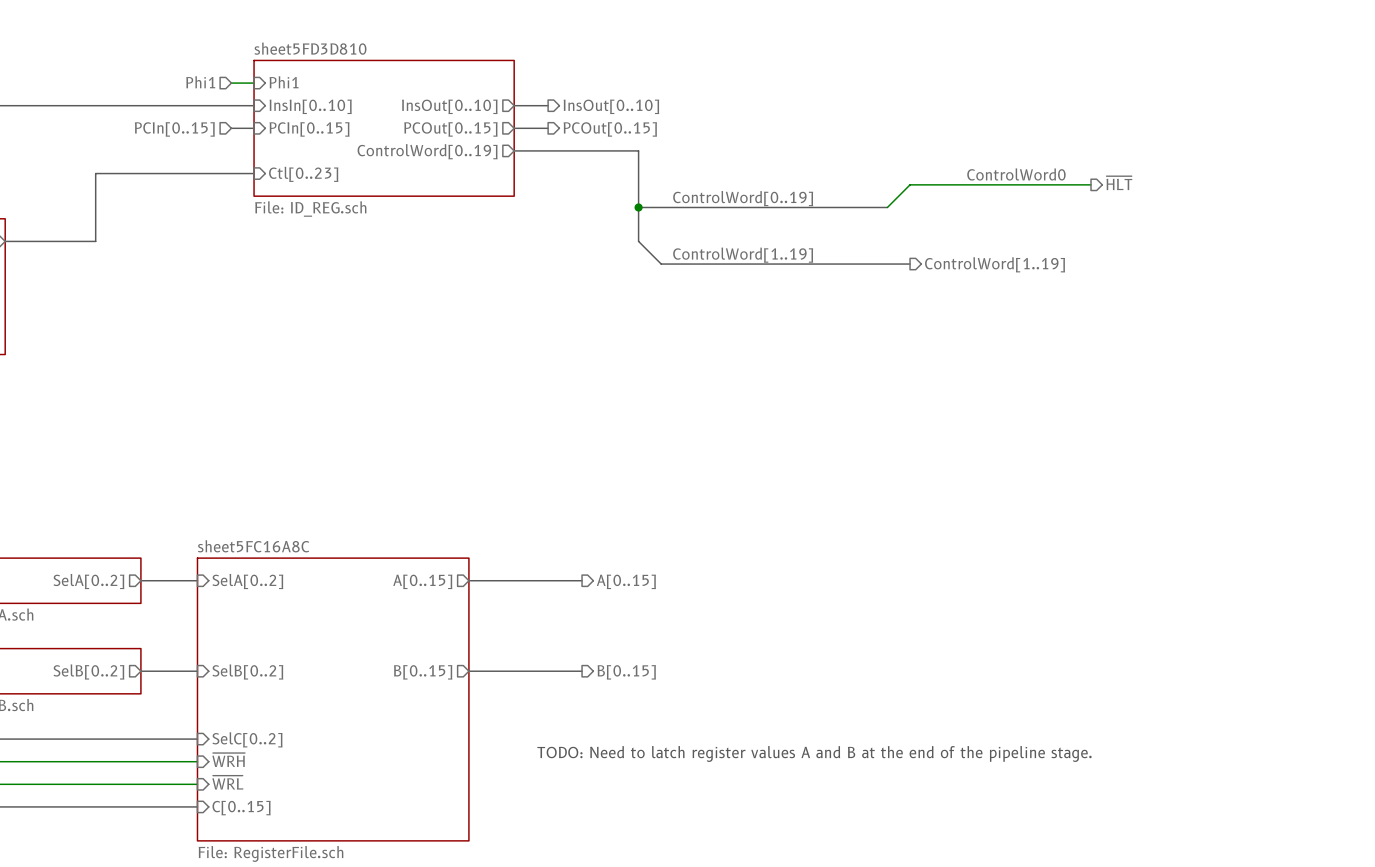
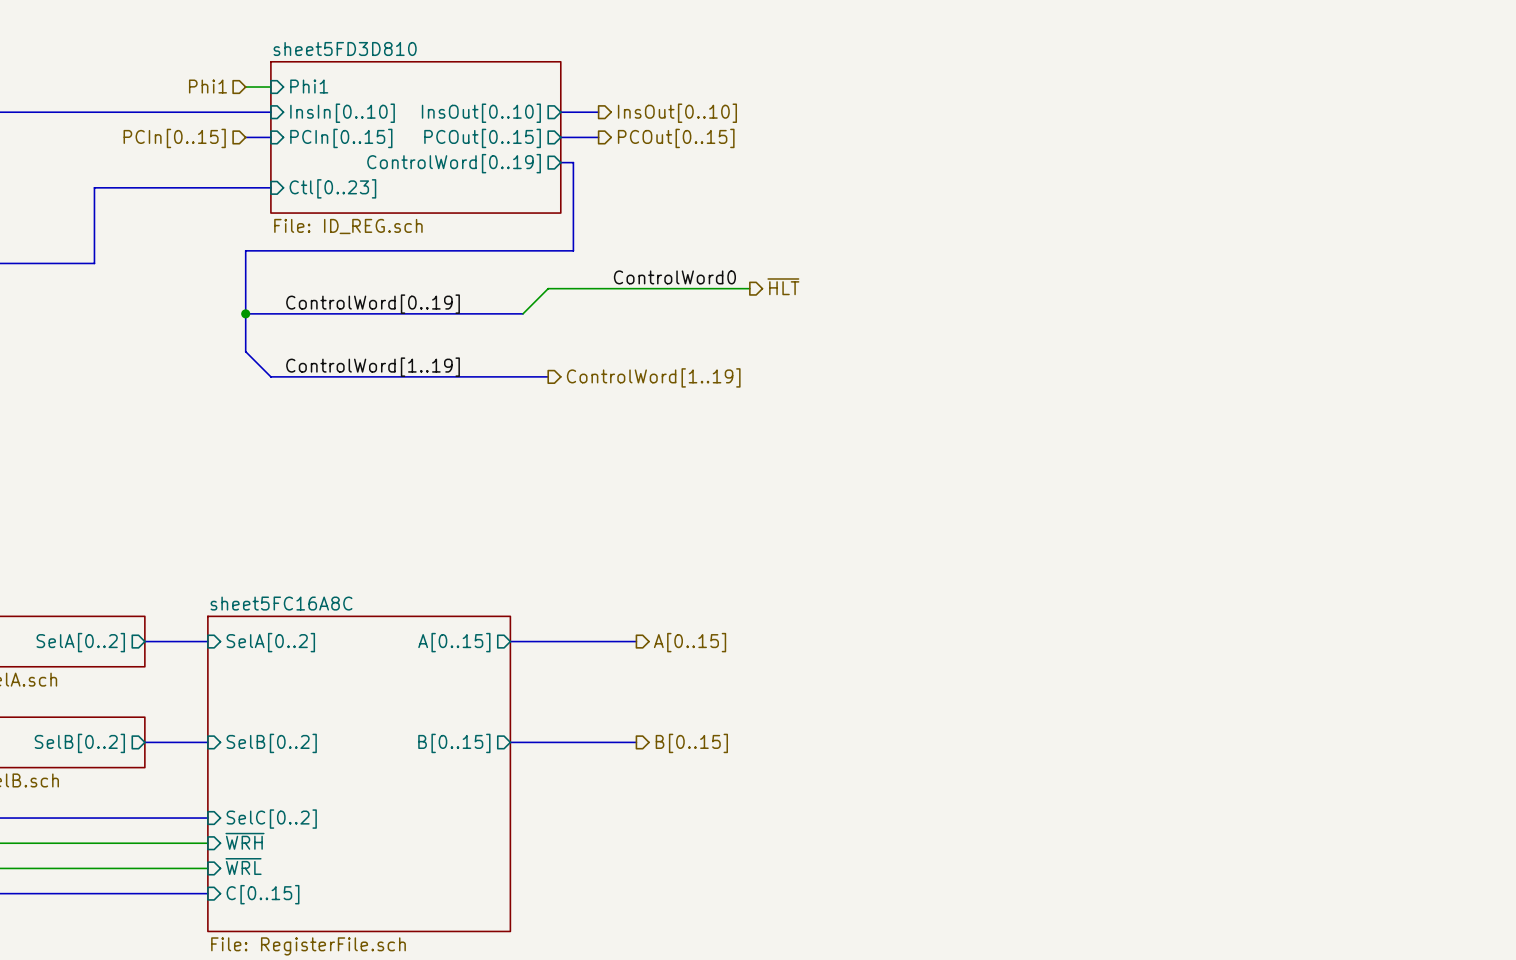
bus: (525, 150) (638, 150) (638, 241) (661, 264) (910, 264) -> (573, 162) (573, 250) (245, 250) (245, 351) (270, 376) (548, 376)
label: ControlWord0 (1016, 174) -> none
hierarchical label: ~{HLT} (1119, 183) -> none
wire: (1091, 184) (910, 184) (887, 207) -> none
label: ControlWord[0..19] (743, 198) -> none
bus: (638, 207) (887, 207) -> none
junction: (638, 207) -> none
label: ControlWord[1..19] (743, 255) -> ControlWord0 (674, 277)
hierarchical label: none -> ~{HLT} (783, 286)
wire: none -> (749, 288) (548, 288) (522, 313)
hierarchical label: ControlWord[1..19] (995, 264) -> none
label: none -> ControlWord[0..19] (373, 304)
bus: none -> (245, 313) (522, 313)
junction: none -> (245, 313)
label: none -> ControlWord[1..19] (373, 367)
hierarchical label: none -> ControlWord[1..19] (653, 377)
text: TODO: Need to latch register values A and B at the end of the pipeline stage. (814, 753) -> none

